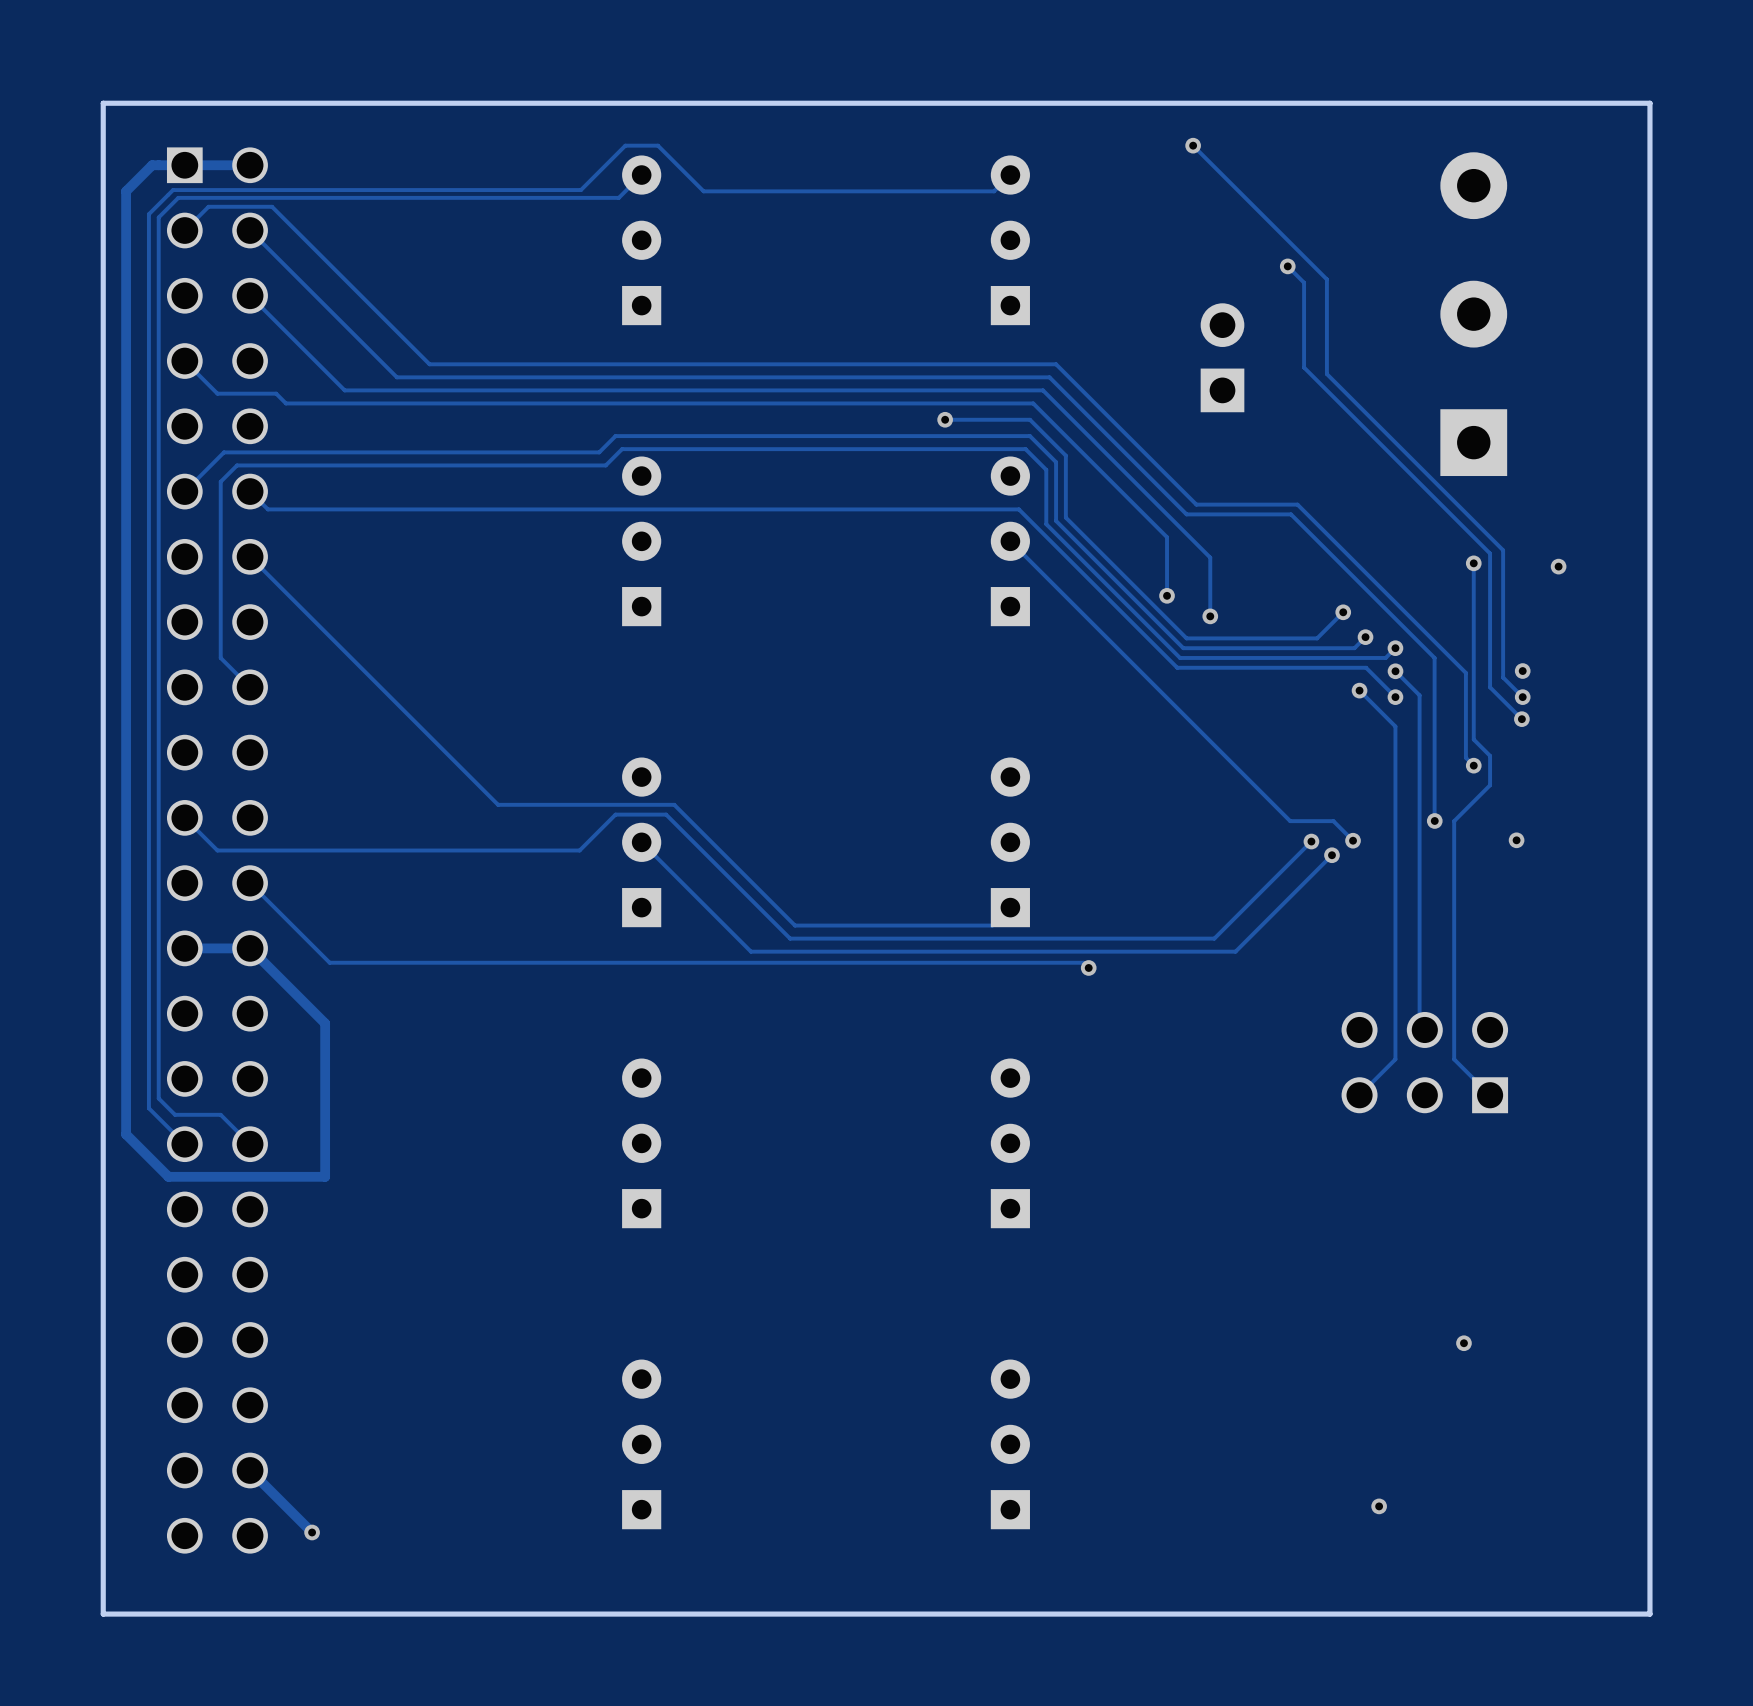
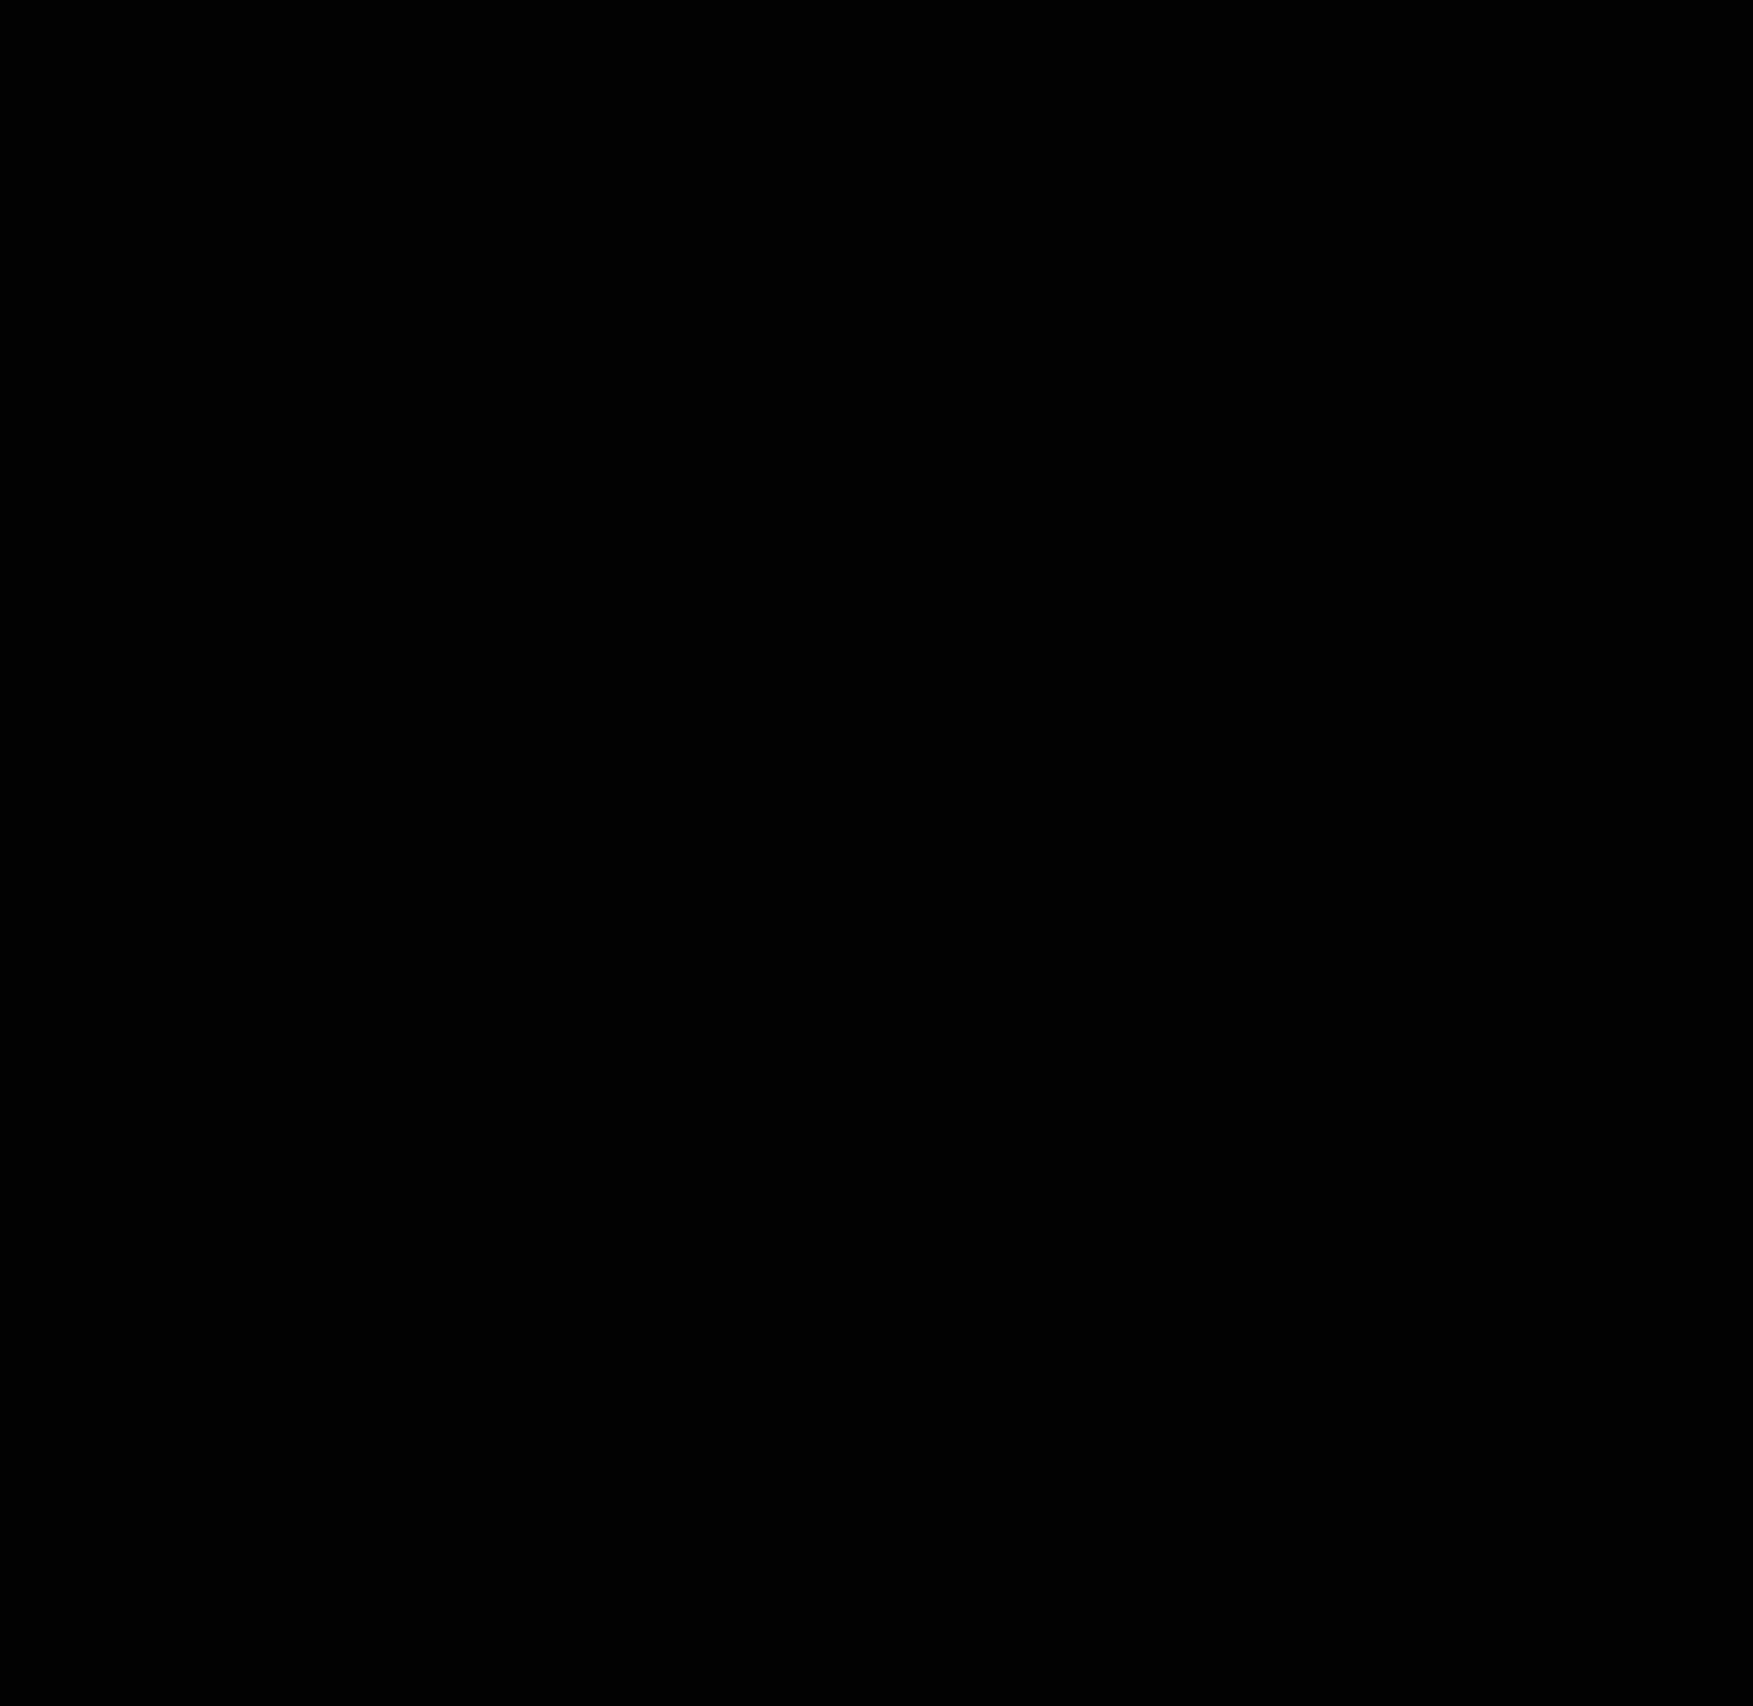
board edge: (1649, 103) (1649, 1614) (103, 1614) (103, 103) (1649, 103) -> none
track: (1193, 145) (1326, 279) (1326, 374) (1503, 550) (1503, 677) (1522, 697) -> none
via: (1193, 145) -> none
track: (250, 165) (152, 165) (126, 191) (126, 1134) (168, 1176) (325, 1176) (325, 1023) (250, 948) (184, 948) -> none
track: (641, 175) (618, 197) (178, 197) (158, 217) (158, 1098) (175, 1114) (220, 1114) (250, 1144) -> none
track: (1010, 175) (994, 191) (703, 191) (657, 145) (625, 145) (580, 190) (173, 190) (168, 194) -> none
track: (168, 194) (148, 214) (148, 1108) (184, 1144) -> none
track: (184, 230) (208, 206) (272, 206) (429, 364) (1056, 364) (1196, 504) (1297, 504) (1465, 672) (1465, 757) (1473, 765) -> none
track: (250, 230) (396, 377) (1049, 377) (1186, 514) (1291, 514) (1434, 657) (1434, 820) -> none
part: (641, 240) -> none
part: (1010, 240) -> none
track: (1287, 266) (1304, 282) (1304, 367) (1490, 553) (1490, 687) (1521, 719) -> none
via: (1287, 266) -> none
track: (250, 295) (344, 390) (1043, 390) (1210, 557) (1210, 616) -> none
part: (1473, 314) -> none
part: (1222, 357) -> none
track: (184, 361) (217, 393) (276, 393) (285, 403) (1033, 403) (1167, 537) (1167, 595) -> none
track: (945, 419) (1029, 419) (1065, 455) (1065, 517) (1186, 638) (1317, 638) (1343, 612) -> none
via: (945, 419) -> none
track: (184, 491) (223, 452) (599, 452) (615, 436) (1029, 436) (1056, 462) (1056, 520) (1183, 648) (1354, 648) (1365, 637) -> none
track: (250, 491) (267, 509) (1018, 509) (1177, 667) (1366, 667) (1395, 697) -> none
part: (641, 541) -> none
track: (1010, 541) (1290, 821) (1333, 821) (1353, 840) -> none
part: (1010, 541) -> none
track: (250, 556) (498, 804) (674, 804) (795, 925) (992, 925) (1010, 907) -> none
track: (1473, 563) (1473, 739) (1490, 755) (1490, 785) (1454, 821) (1454, 1059) (1490, 1095) -> none
via: (1473, 563) -> none
via: (1558, 566) -> none
via: (1167, 595) -> none
via: (1343, 612) -> none
via: (1210, 616) -> none
via: (1365, 637) -> none
track: (1395, 648) (1385, 657) (1180, 657) (1046, 524) (1046, 469) (1025, 449) (622, 449) (605, 465) (237, 465) (220, 481) (220, 657) (250, 687) -> none
via: (1395, 648) -> none
track: (1395, 671) (1419, 695) (1419, 1024) (1424, 1029) -> none
via: (1395, 671) -> none
via: (1522, 671) -> none
track: (1359, 690) (1395, 726) (1395, 1059) (1359, 1095) -> none
via: (1359, 690) -> none
via: (1395, 697) -> none
via: (1522, 697) -> none
via: (1521, 719) -> none
via: (1473, 765) -> none
track: (184, 817) (217, 850) (579, 850) (615, 814) (666, 814) (790, 938) (1214, 938) (1311, 841) -> none
via: (1434, 820) -> none
via: (1353, 840) -> none
via: (1516, 840) -> none
via: (1311, 841) -> none
track: (641, 842) (750, 951) (1235, 951) (1331, 855) -> none
part: (641, 842) -> none
part: (1010, 842) -> none
part: (217, 850) -> none
via: (1331, 855) -> none
track: (250, 883) (329, 962) (1083, 962) (1088, 967) -> none
via: (1088, 967) -> none
part: (1424, 1062) -> none
part: (641, 1143) -> none
part: (1010, 1143) -> none
via: (1463, 1343) -> none
part: (641, 1444) -> none
part: (1010, 1444) -> none
track: (250, 1470) (312, 1532) -> none
via: (1379, 1506) -> none
via: (312, 1532) -> none

